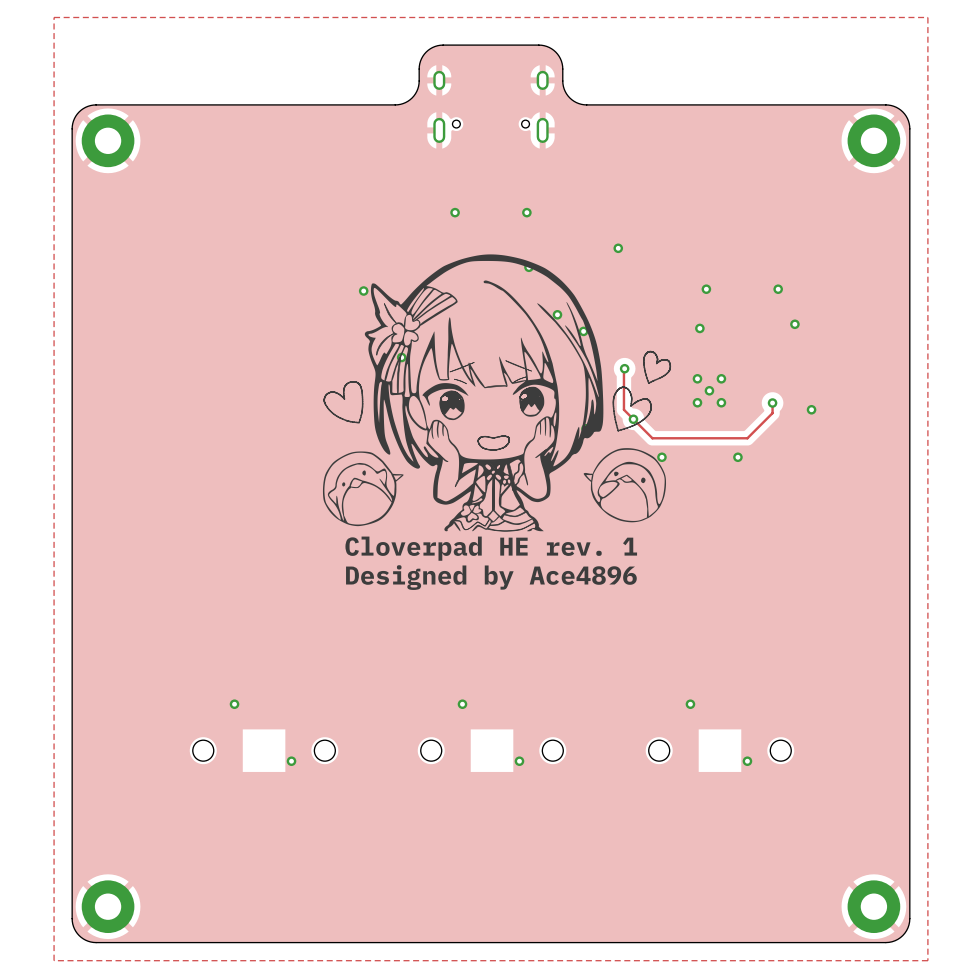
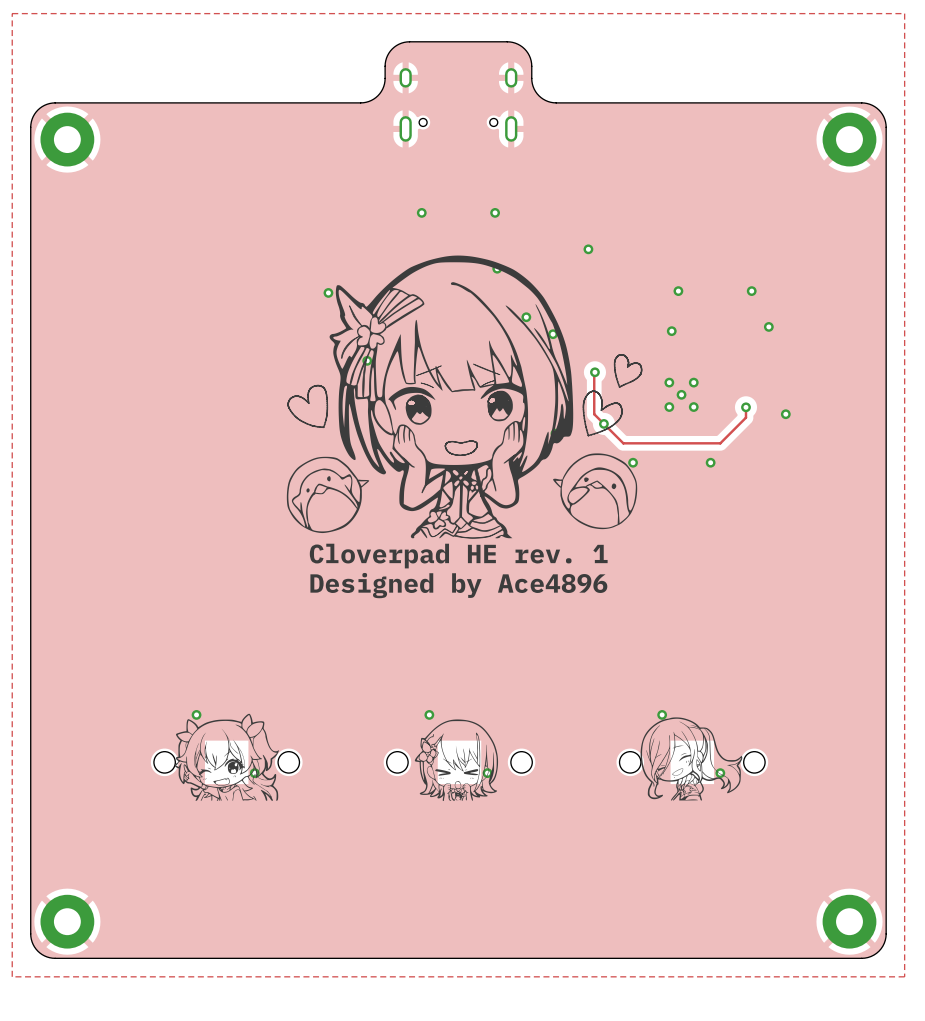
drawing: none -> [174, 713, 279, 801]
drawing: none -> [640, 717, 743, 801]
drawing: none -> [414, 719, 499, 801]

